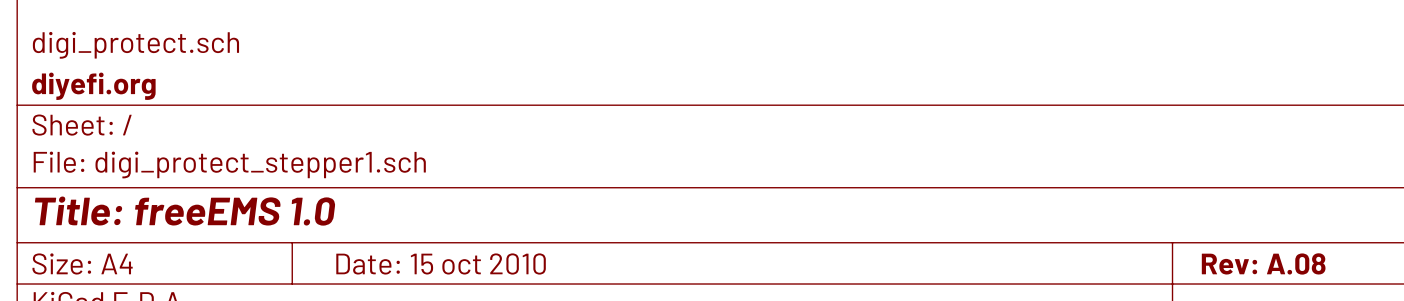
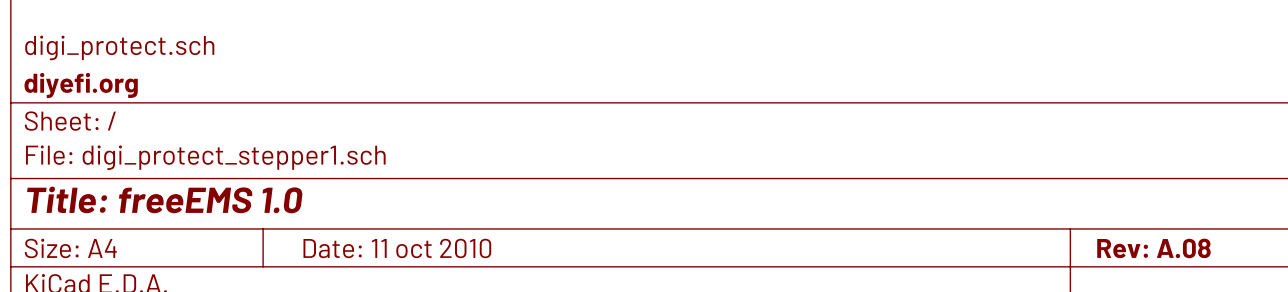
title block: Date: 15 oct 2010 (441, 263) -> Date: 11 oct 2010 (397, 248)

